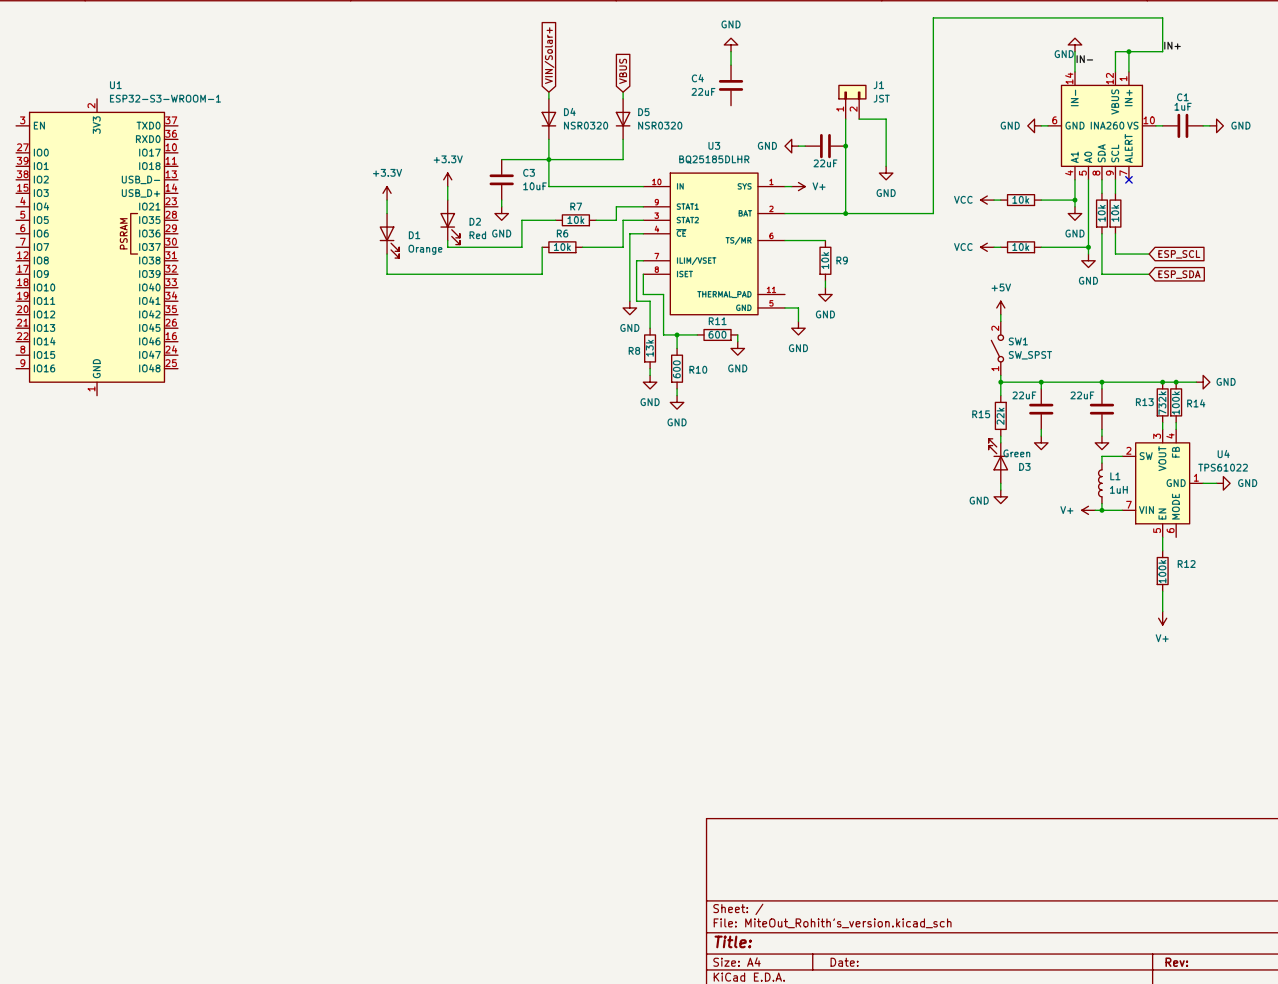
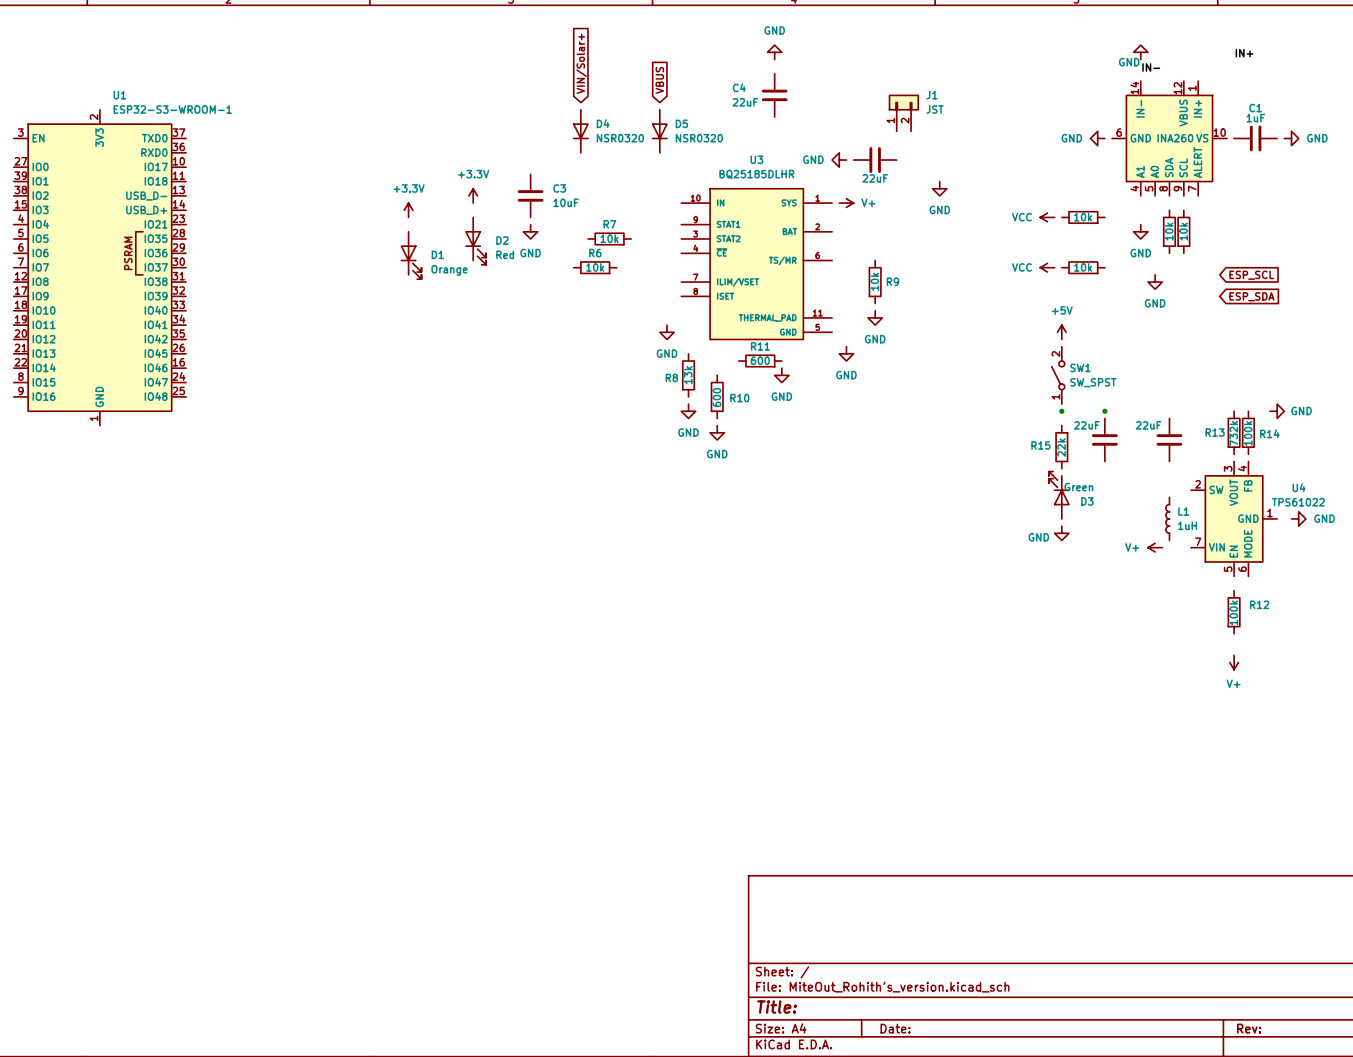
wire: (731, 51) (731, 65) -> none
wire: (1074, 51) (1074, 71) -> none
wire: (1128, 51) (1128, 71) -> none
junction: (1128, 51) -> none
wire: (1115, 71) (1115, 51) (1162, 51) (1162, 17) (933, 17) (933, 213) (784, 213) -> none
wire: (548, 92) (548, 98) -> none
wire: (623, 92) (623, 98) -> none
wire: (845, 119) (845, 213) -> none
wire: (859, 119) (886, 119) (886, 166) -> none
wire: (1041, 125) (1048, 125) -> none
wire: (1155, 125) (1162, 125) -> none
wire: (1203, 125) (1209, 125) -> none
wire: (548, 139) (548, 186) (643, 186) -> none
wire: (623, 139) (623, 159) (501, 159) -> none
wire: (798, 146) (805, 146) -> none
junction: (845, 146) -> none
junction: (548, 159) -> none
wire: (1074, 179) (1074, 206) -> none
wire: (1088, 179) (1088, 254) -> none
wire: (1101, 179) (1101, 193) -> none
wire: (1115, 179) (1115, 193) -> none
no-connect mark: (1128, 179) -> none
wire: (447, 186) (447, 200) -> none
wire: (784, 186) (791, 186) -> none
wire: (387, 200) (387, 213) -> none
wire: (501, 200) (501, 206) -> none
wire: (994, 200) (1000, 200) -> none
wire: (1041, 200) (1074, 200) -> none
junction: (1074, 200) -> none
wire: (643, 206) (616, 206) (616, 220) (596, 220) -> none
junction: (845, 213) -> none
wire: (555, 220) (521, 220) (521, 247) (447, 247) (447, 240) -> none
wire: (643, 220) (623, 220) (623, 247) (582, 247) -> none
wire: (643, 233) (629, 233) (629, 301) -> none
wire: (1101, 233) (1101, 274) (1149, 274) -> none
wire: (1115, 233) (1115, 254) (1149, 254) -> none
wire: (784, 240) (825, 240) -> none
wire: (542, 247) (542, 274) (387, 274) (387, 254) -> none
wire: (994, 247) (1000, 247) -> none
wire: (1041, 247) (1088, 247) -> none
junction: (1088, 247) -> none
wire: (643, 260) (636, 260) (636, 301) (650, 301) (650, 328) -> none
wire: (643, 274) (643, 294) (663, 294) (663, 334) (697, 334) -> none
wire: (825, 281) (825, 287) -> none
wire: (784, 307) (798, 307) (798, 321) -> none
wire: (1000, 314) (1000, 321) -> none
wire: (677, 334) (677, 348) -> none
junction: (677, 334) -> none
wire: (737, 334) (737, 341) -> none
wire: (650, 368) (650, 375) -> none
wire: (1000, 375) (1000, 395) -> none
wire: (1000, 382) (1196, 382) -> none
wire: (1041, 382) (1041, 388) -> none
wire: (1101, 382) (1101, 388) -> none
junction: (1101, 382) -> none
junction: (1162, 382) -> none
junction: (1176, 382) -> none
wire: (677, 388) (677, 395) -> none
wire: (1162, 422) (1162, 429) -> none
wire: (1176, 422) (1176, 429) -> none
wire: (1041, 429) (1041, 436) -> none
wire: (1101, 429) (1101, 436) -> none
wire: (1000, 436) (1000, 442) -> none
power symbol: (1041, 442) -> none
power symbol: (1101, 442) -> none
wire: (1122, 456) (1101, 456) (1101, 463) -> none
wire: (1000, 483) (1000, 490) -> none
wire: (1203, 483) (1216, 483) -> none
wire: (1101, 503) (1101, 510) -> none
wire: (1095, 510) (1122, 510) -> none
junction: (1101, 510) -> none
wire: (1162, 537) (1162, 550) -> none
wire: (1162, 591) (1162, 611) -> none

